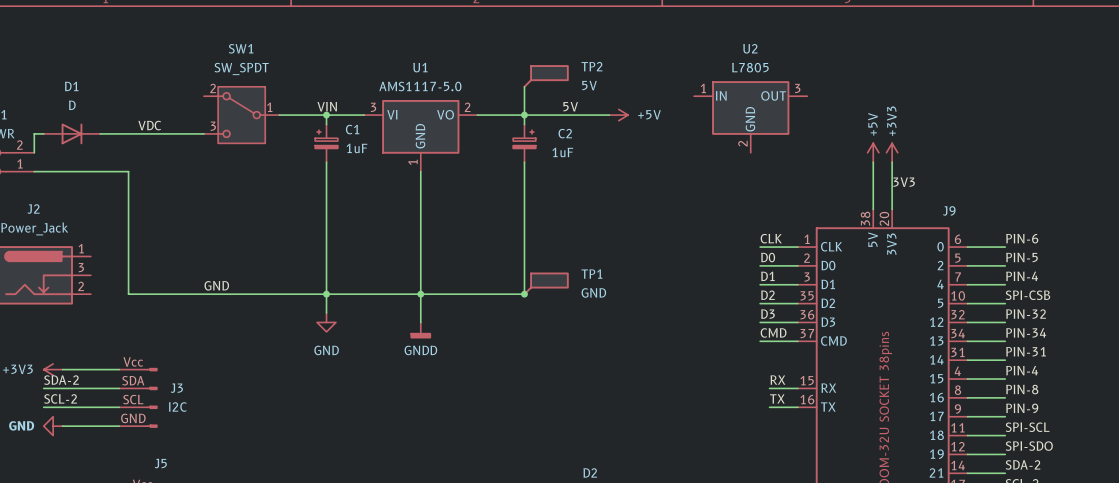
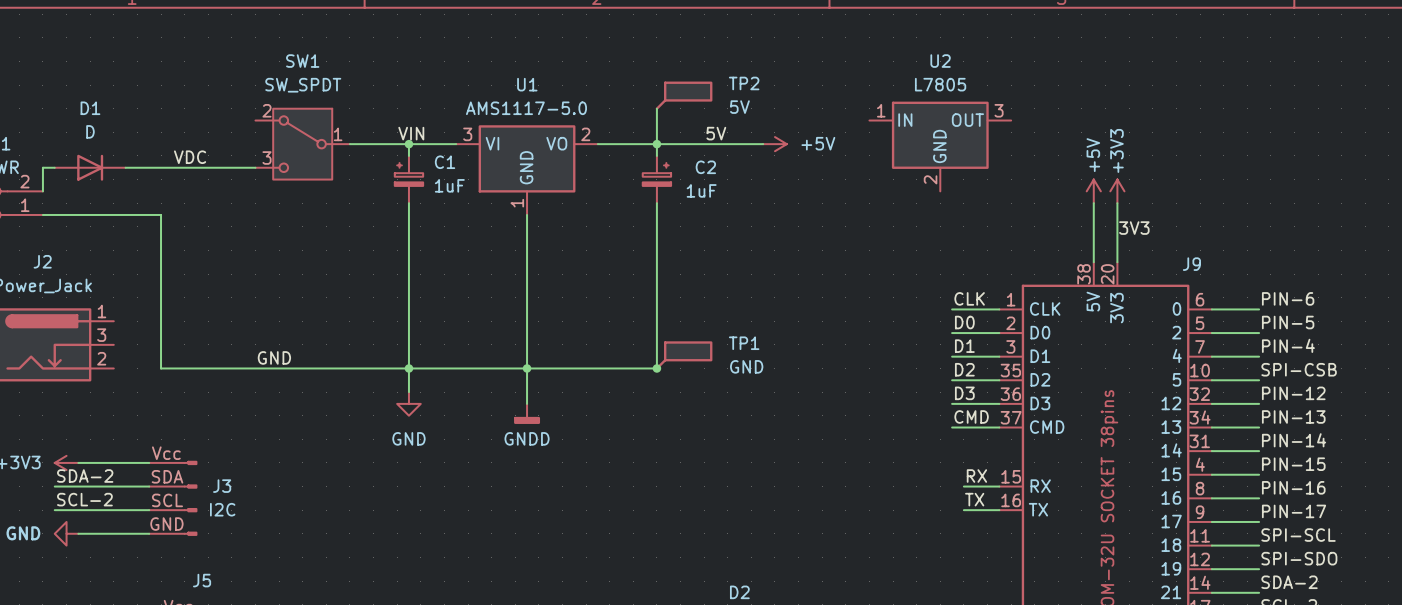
label: PIN-32 (1026, 314) -> PIN-12 (1293, 393)
label: PIN-34 (1026, 332) -> PIN-13 (1293, 416)
label: PIN-31 (1026, 351) -> PIN-14 (1294, 440)
label: PIN-4 (1022, 370) -> PIN-15 (1293, 464)
label: PIN-8 (1022, 389) -> PIN-16 (1293, 487)
label: PIN-9 (1022, 408) -> PIN-17 (1294, 511)

